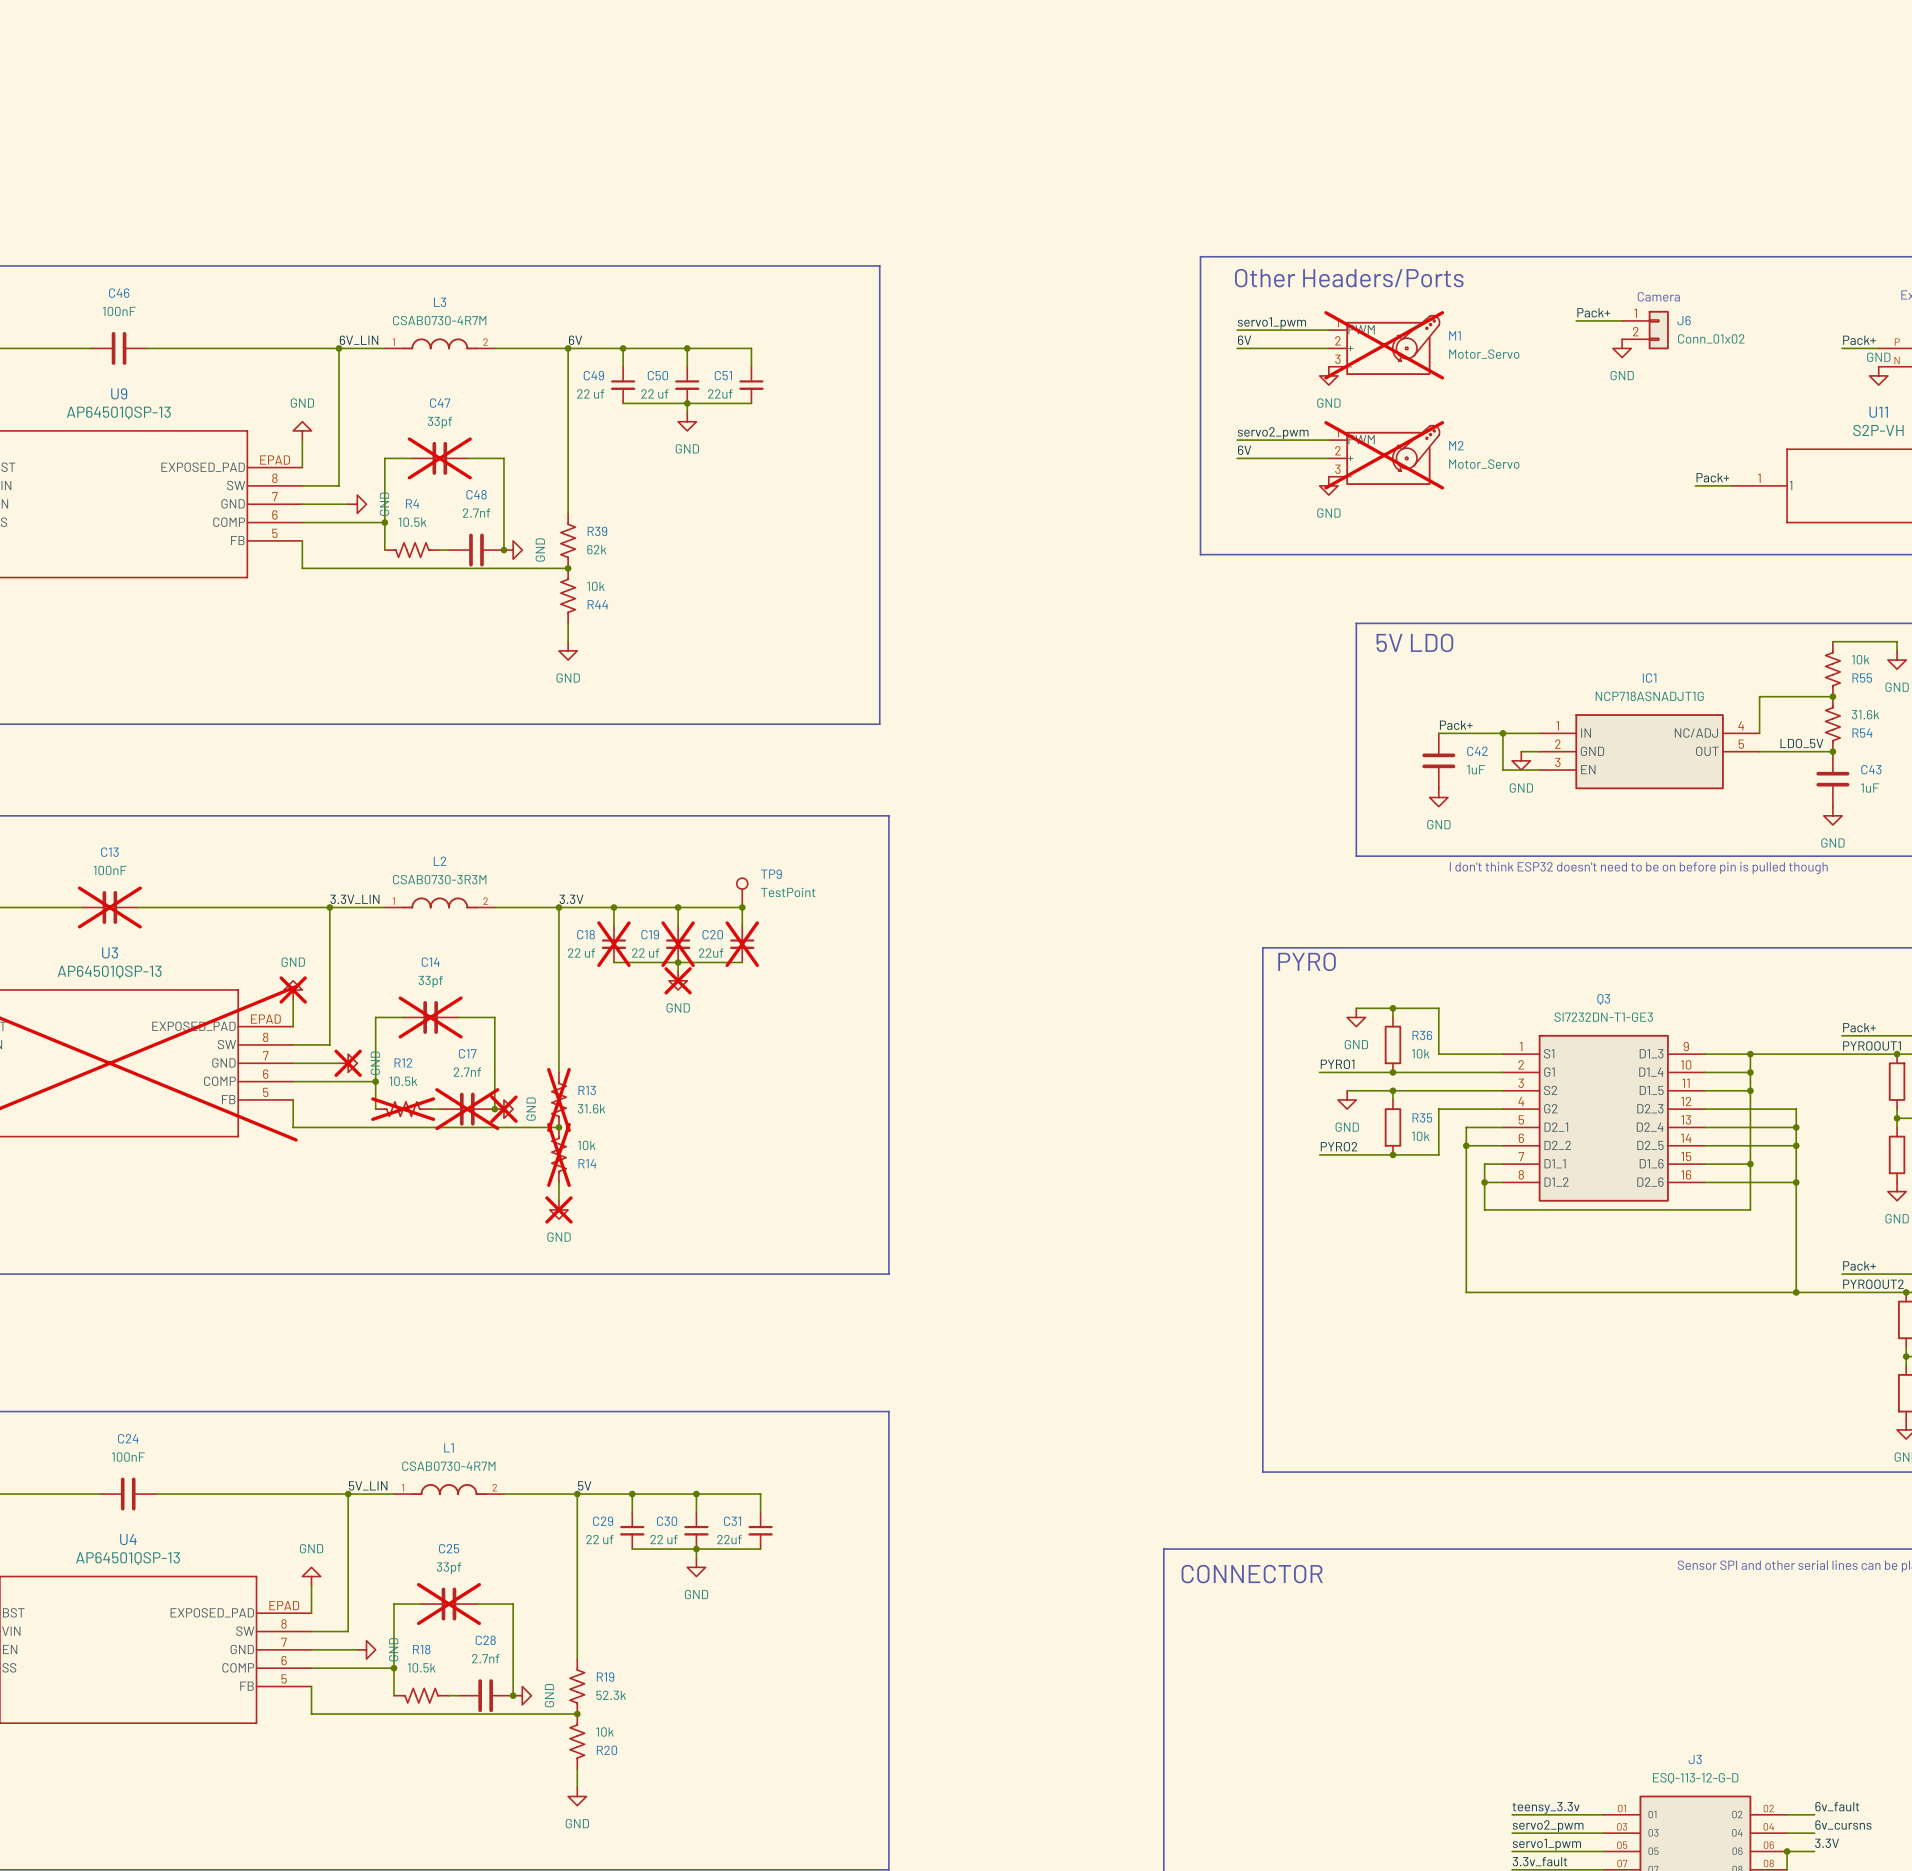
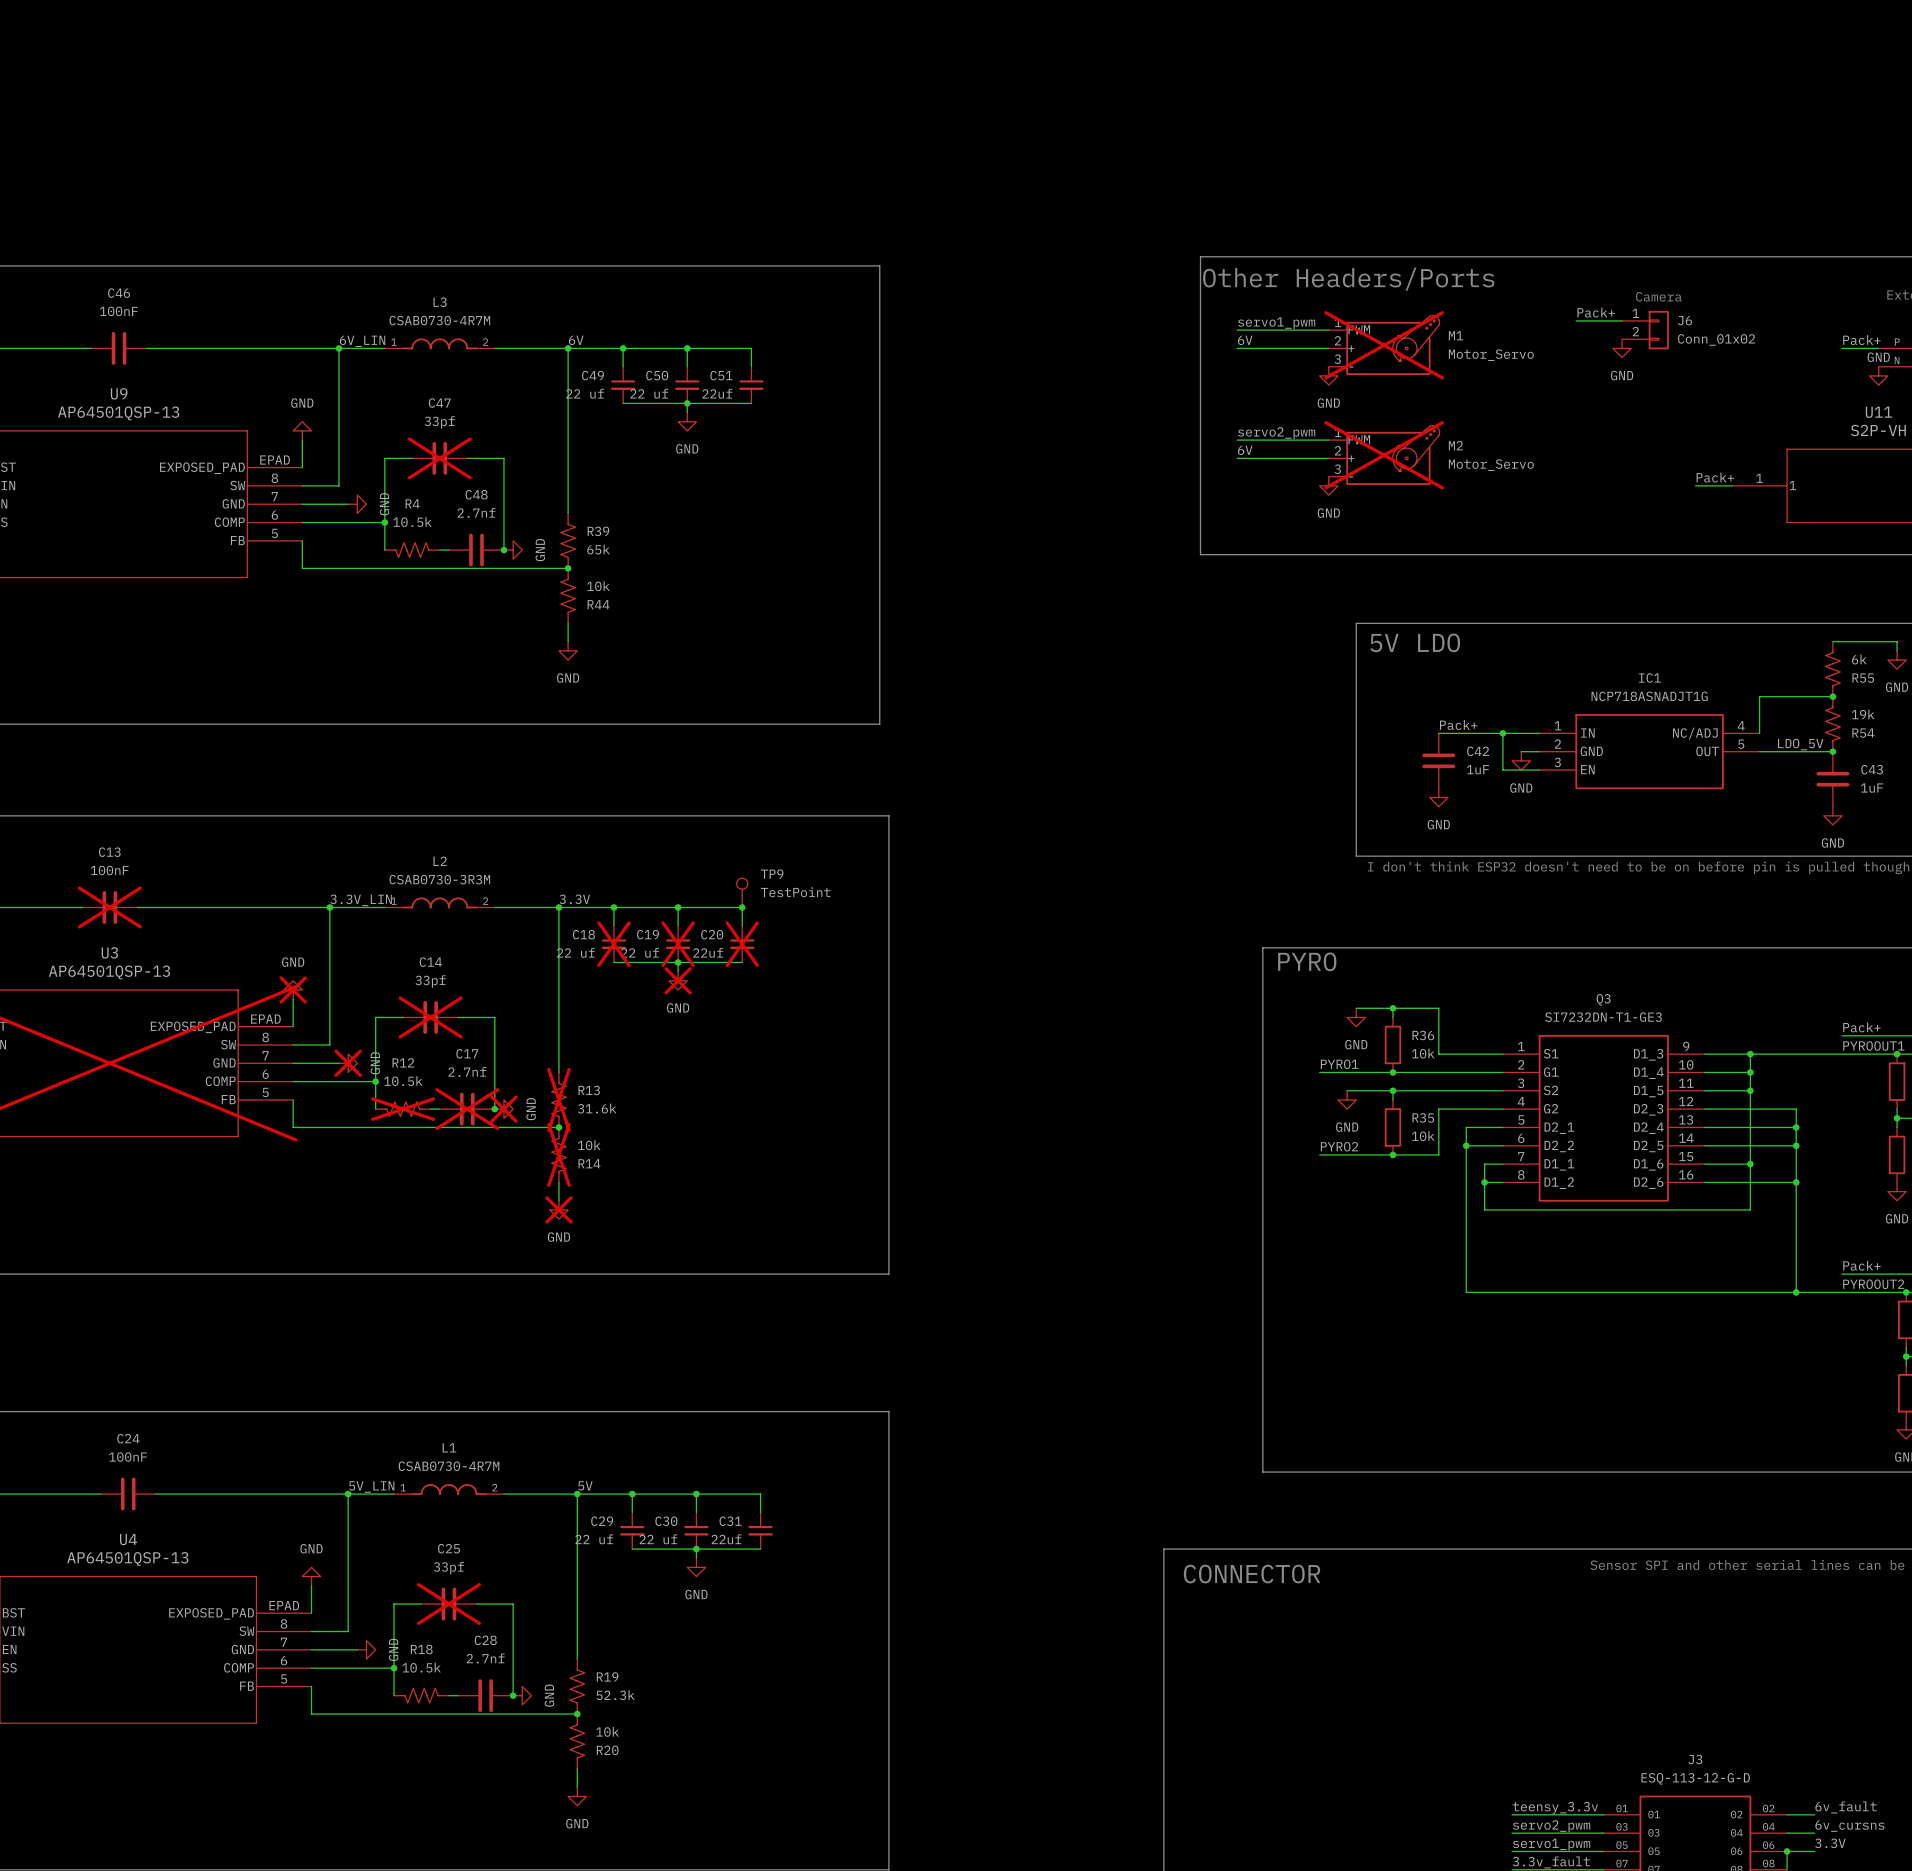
R39 value: 62k (596, 549) -> 65k (598, 549)
R55 value: 10k (1860, 659) -> 6k (1859, 659)
R54 value: 31.6k (1865, 714) -> 19k (1863, 714)

